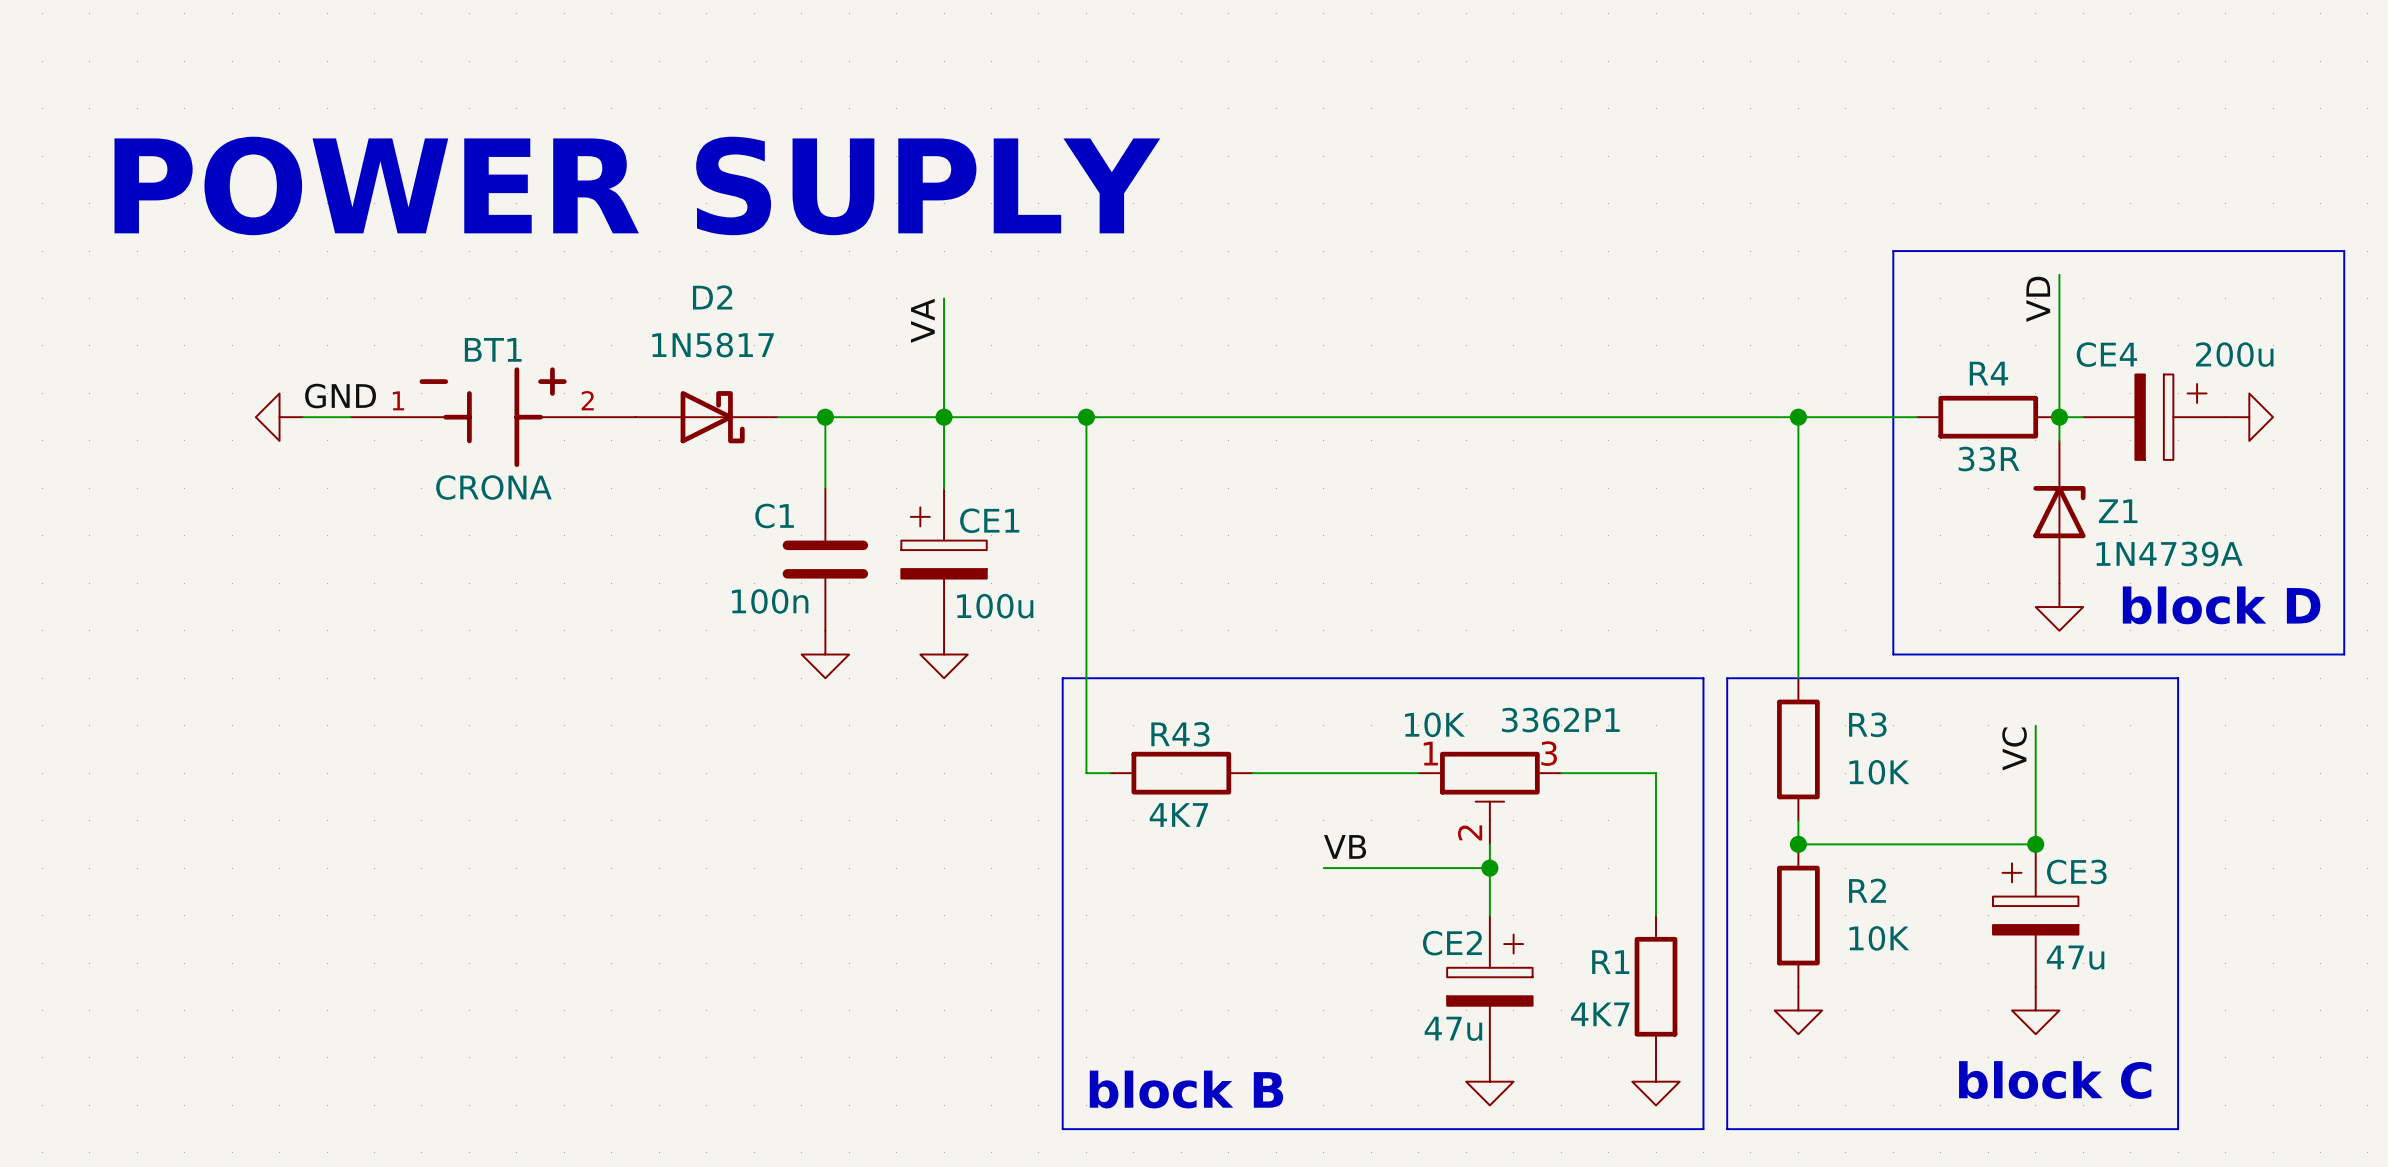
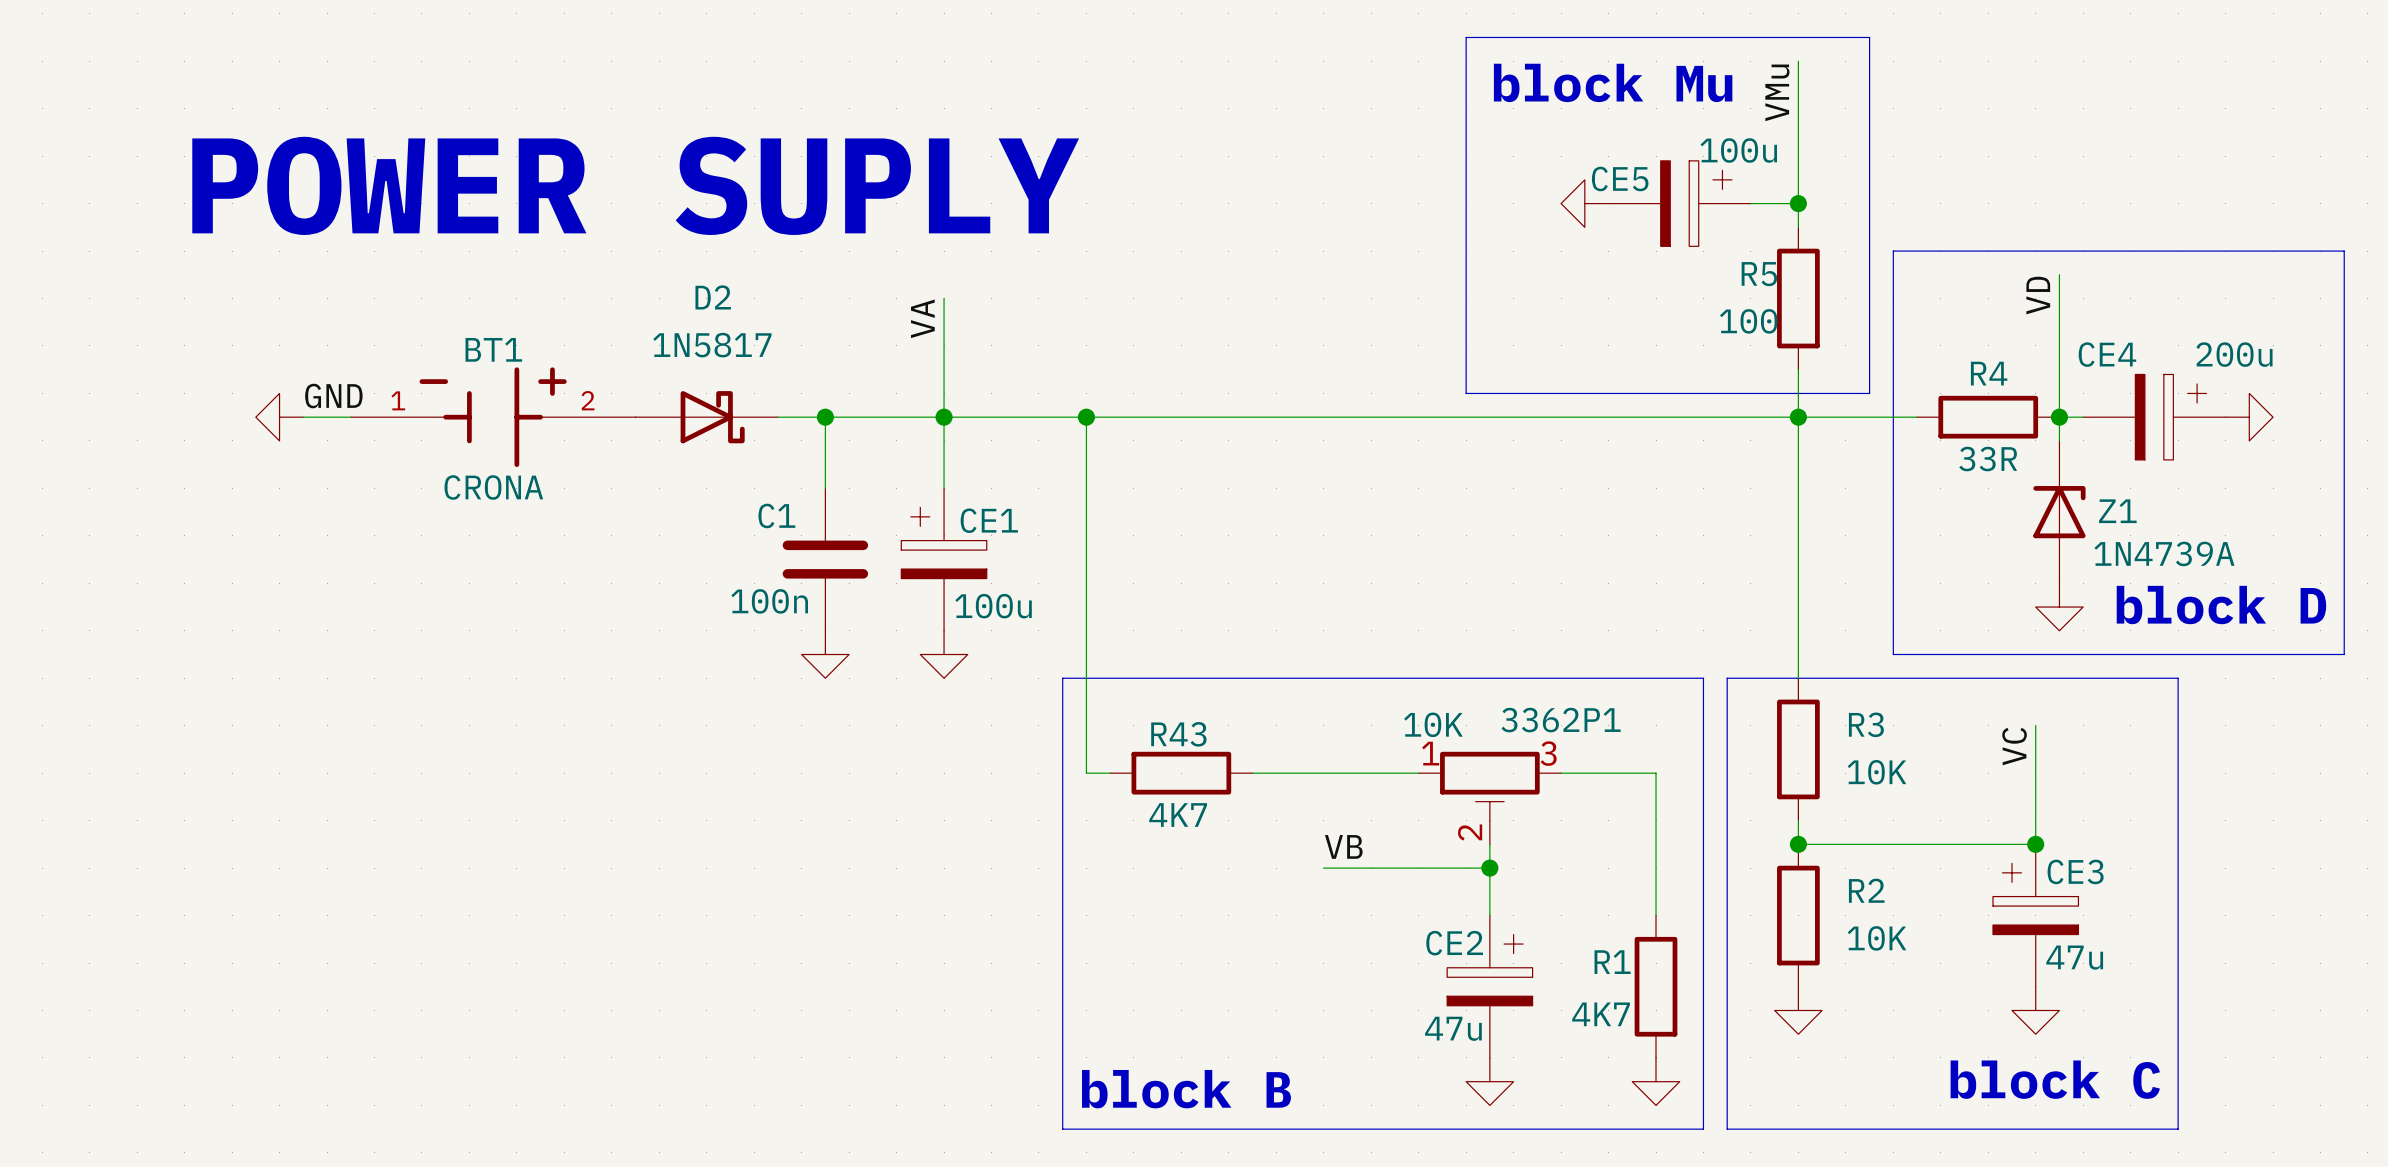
line: none -> (1466, 37) (1869, 37) (1869, 393) (1466, 393) (1466, 37)
wire: none -> (1798, 61) (1798, 227)
text: none -> block Mu (1613, 82)
label: none -> VMu (1777, 92)
power symbol: none -> (1584, 203)
CE5: none -> 100u (1679, 203)
wire: none -> (1750, 203) (1798, 203)
junction: none -> (1798, 203)
R5: none -> 100 (1798, 298)
wire: none -> (1798, 369) (1798, 417)

